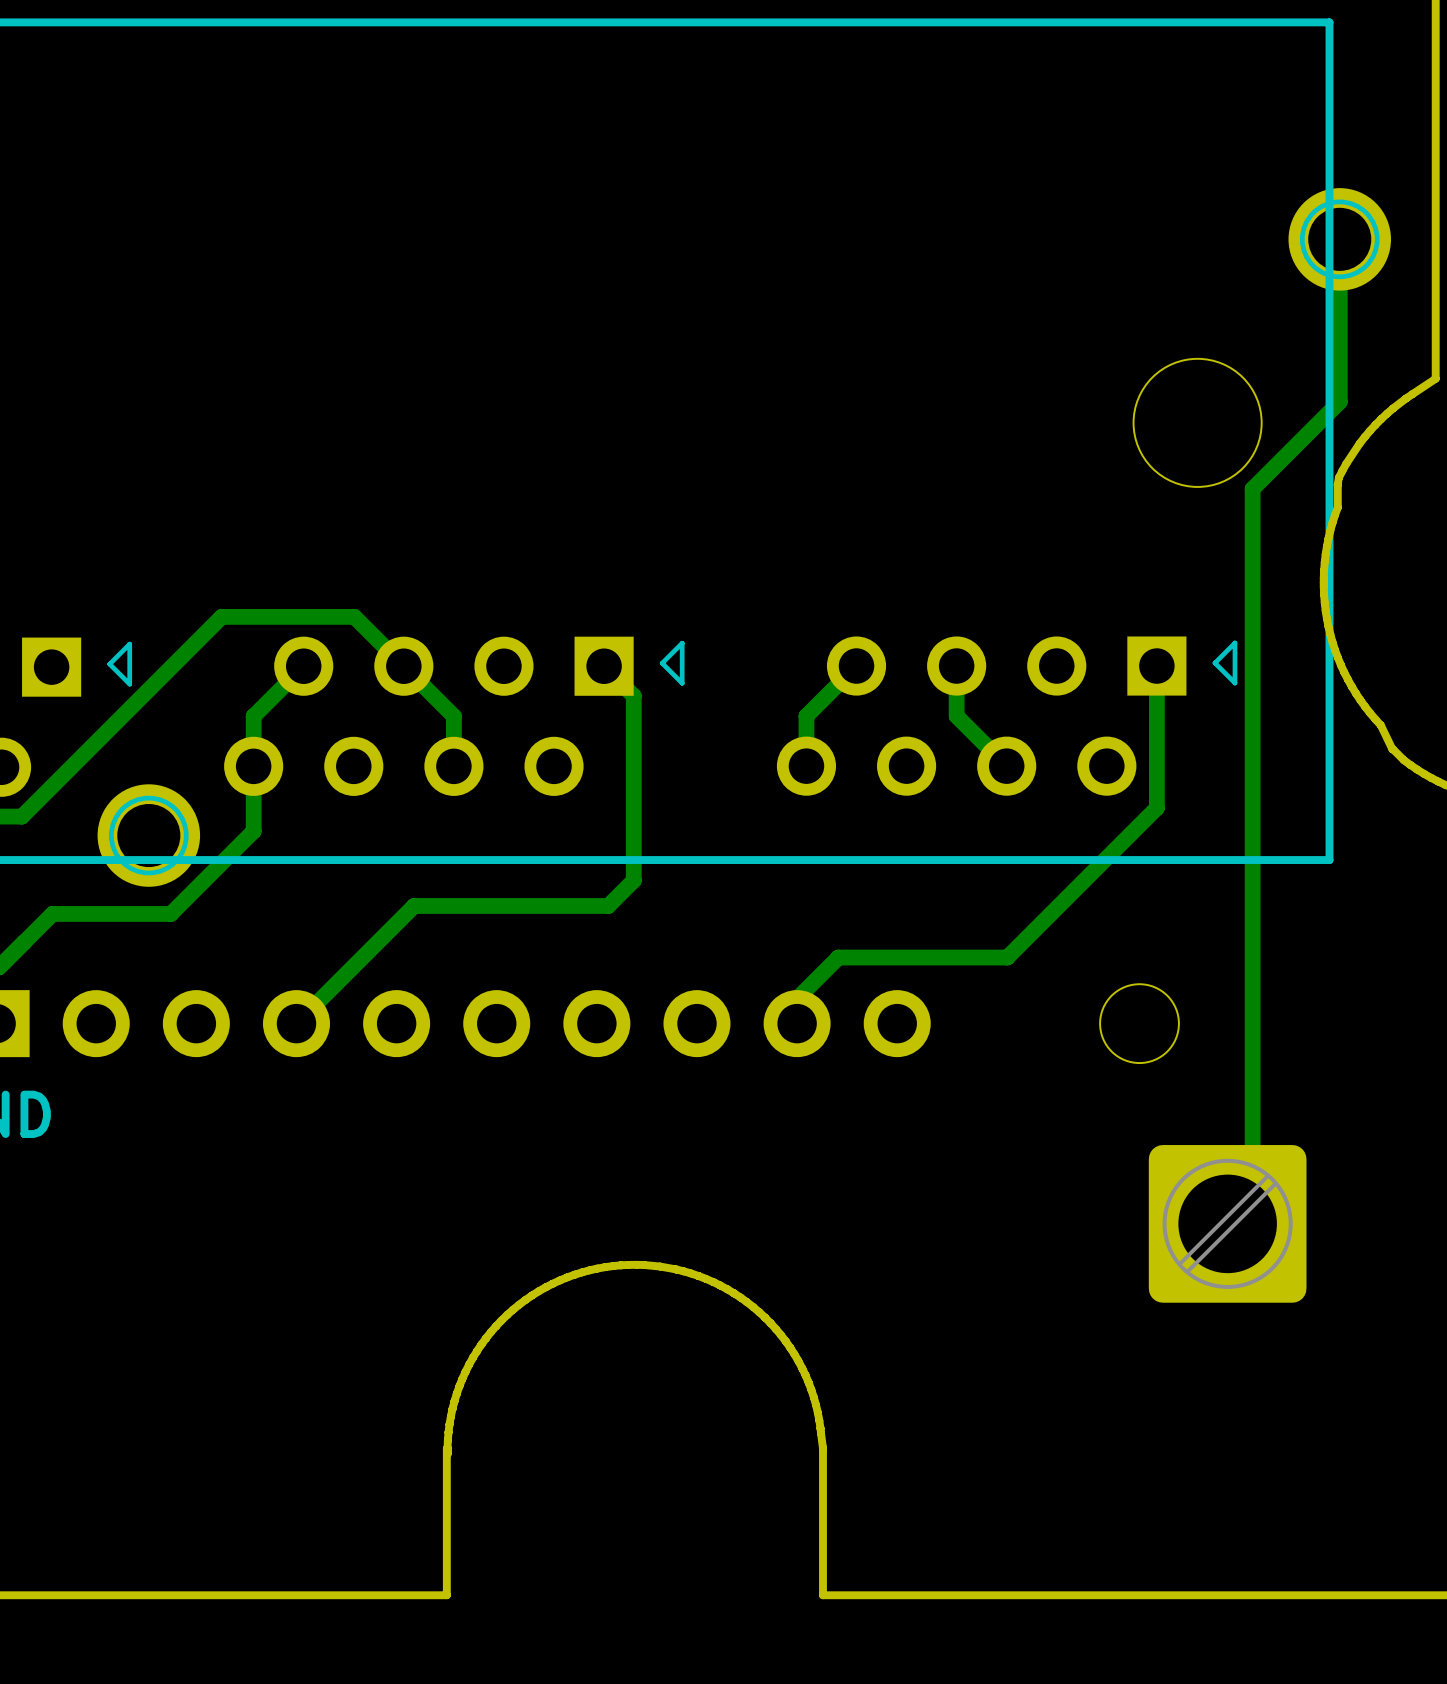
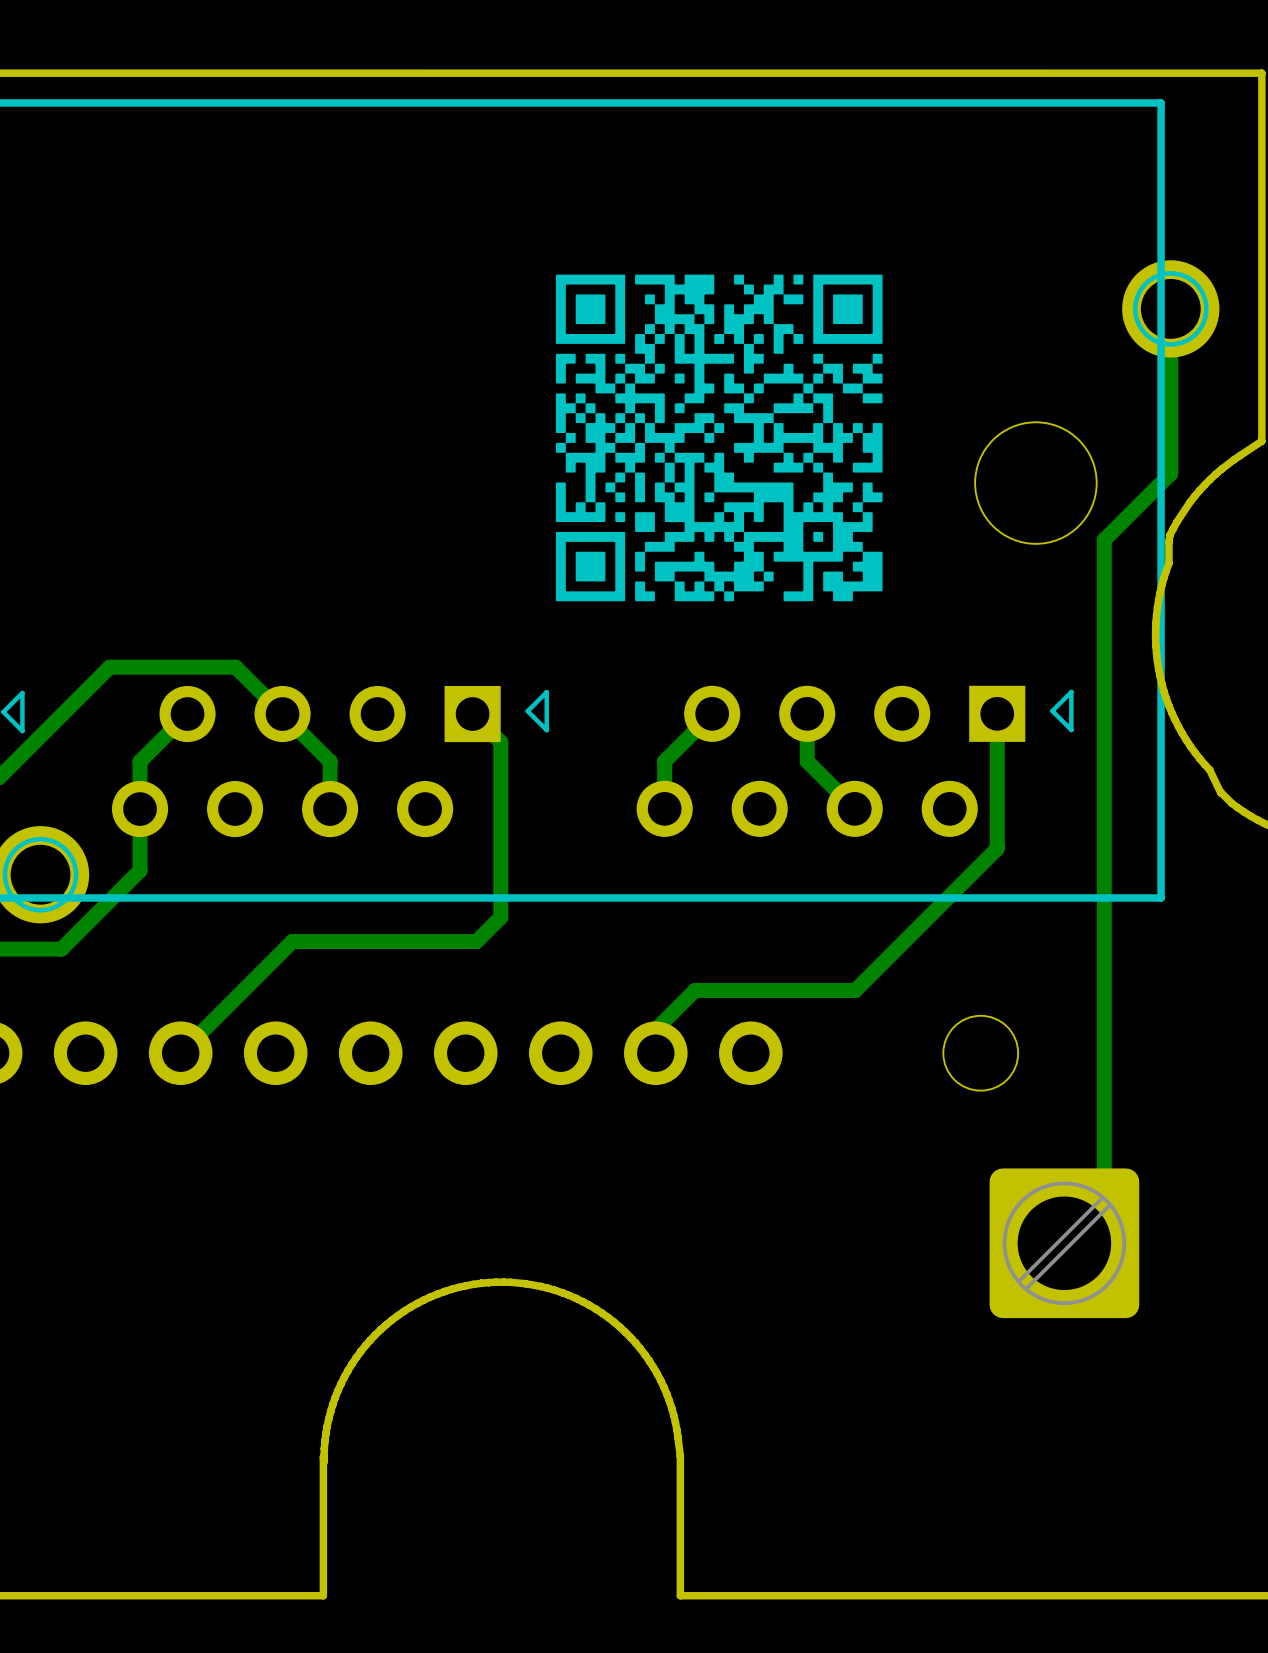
drawing: none -> [555, 274, 883, 602]
track: (1339, 401) (1252, 488) (1252, 1198) -> (1170, 463) (1170, 473) (1104, 540) (1104, 1203) (1064, 1243)

